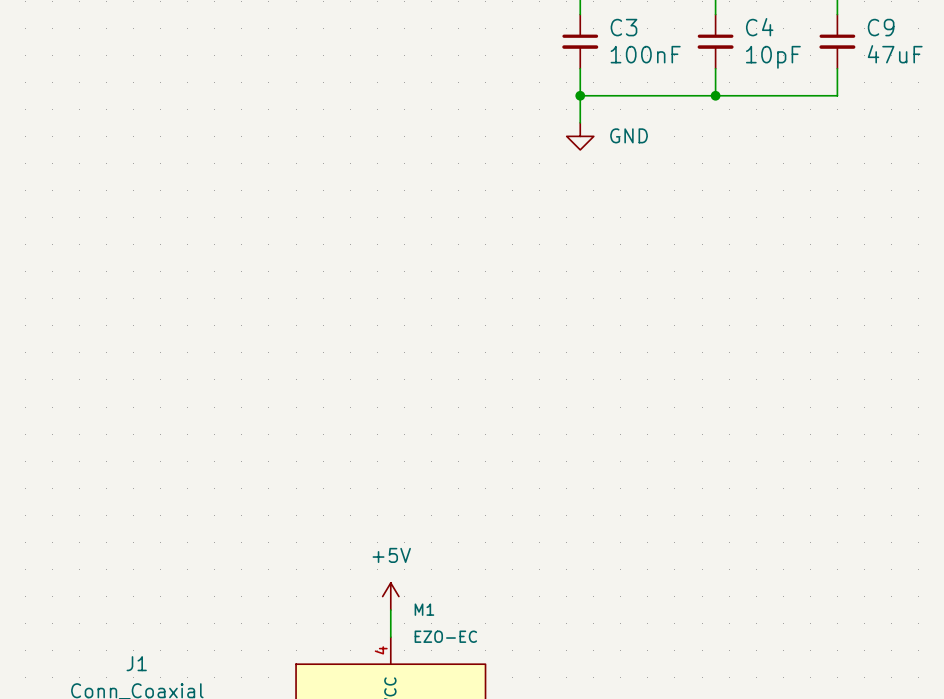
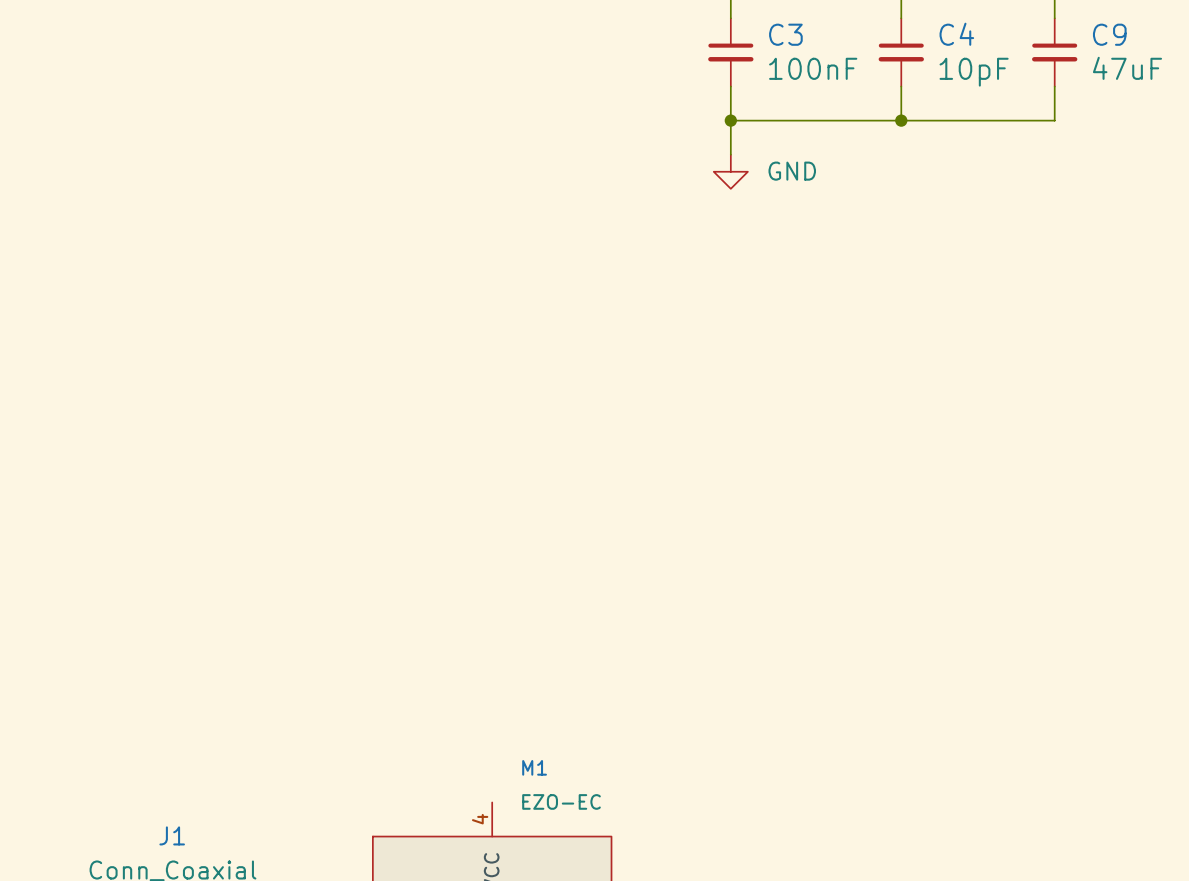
power symbol: +5V (390, 596) -> none
wire: (390, 610) (390, 637) -> none

